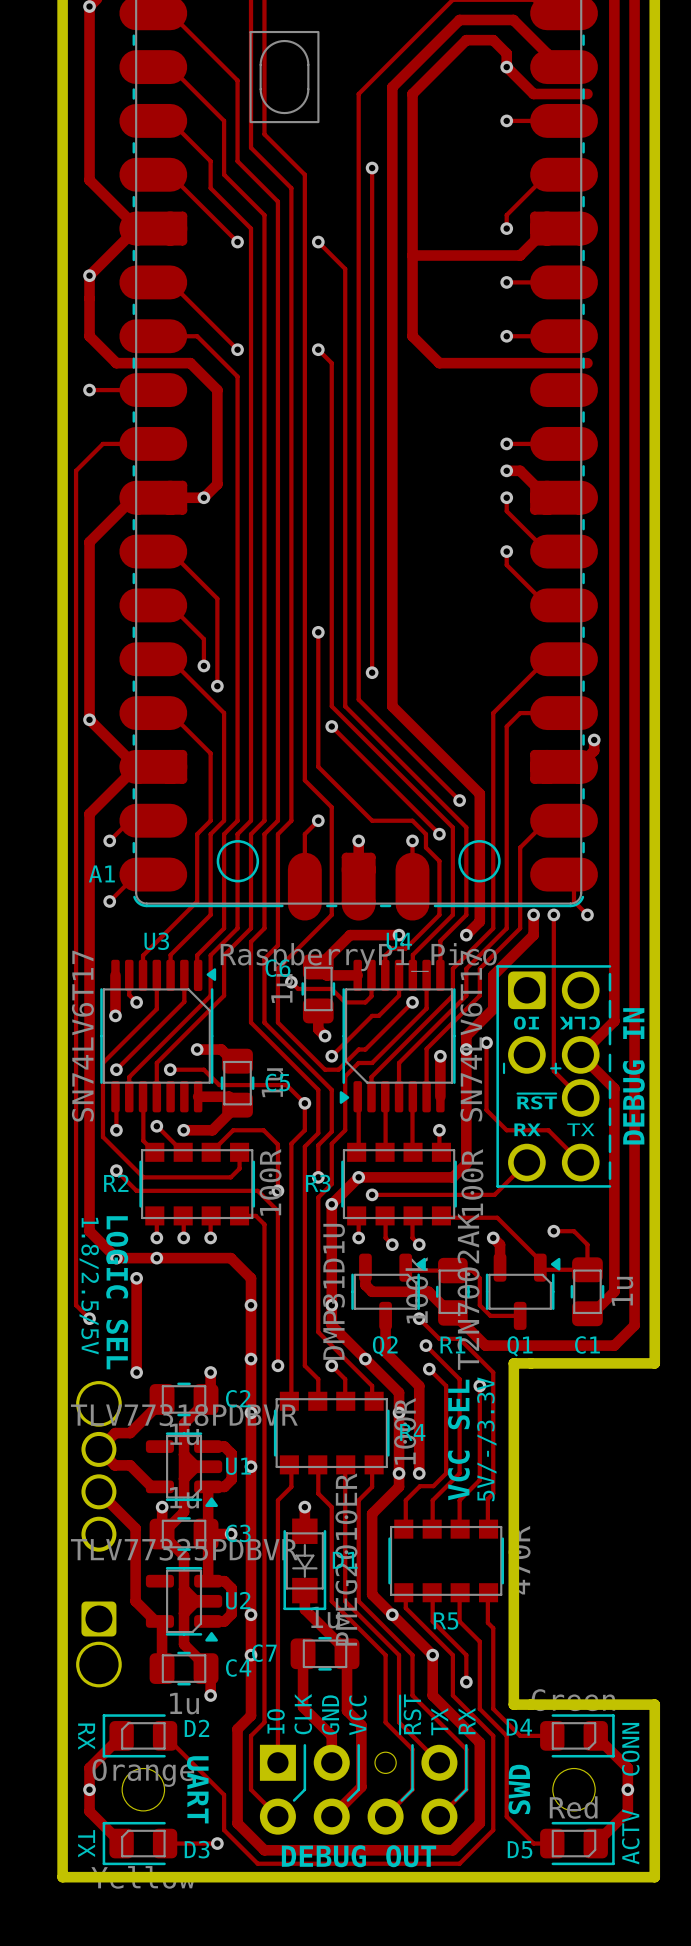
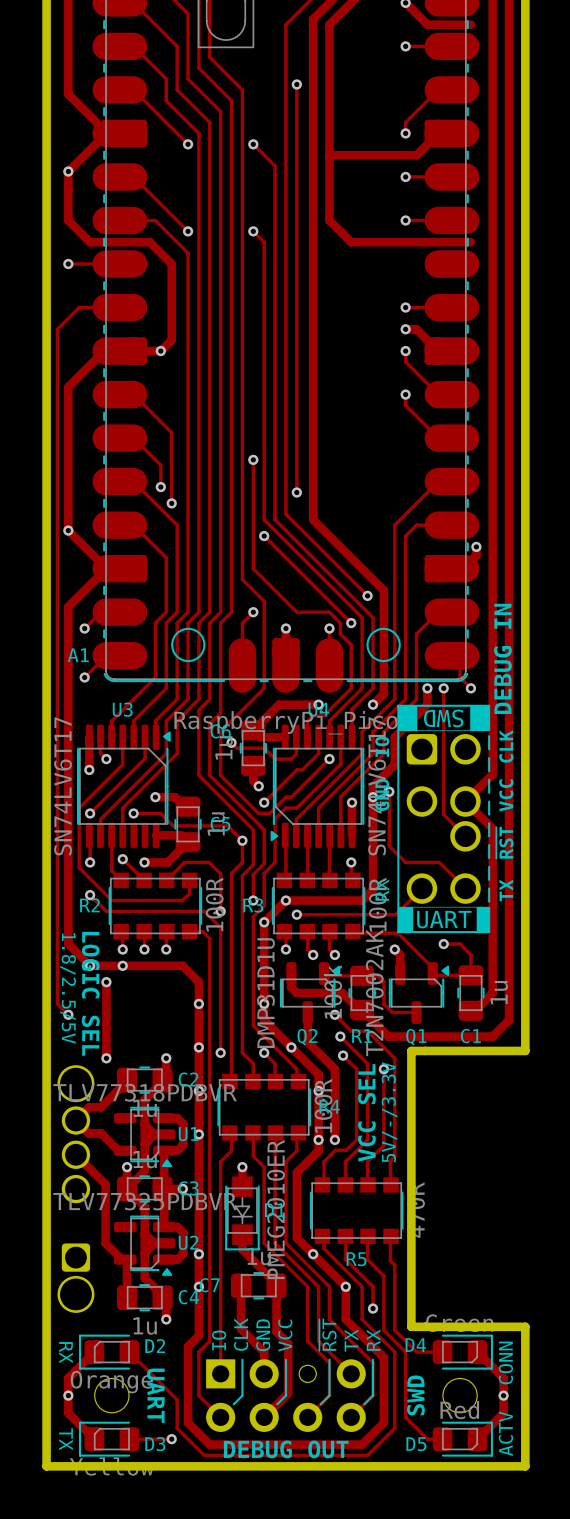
part footprint: [496, 965, 612, 1188] -> [397, 704, 491, 934]
text position: DEBUG IN (633, 1076) -> DEBUG IN (502, 658)

